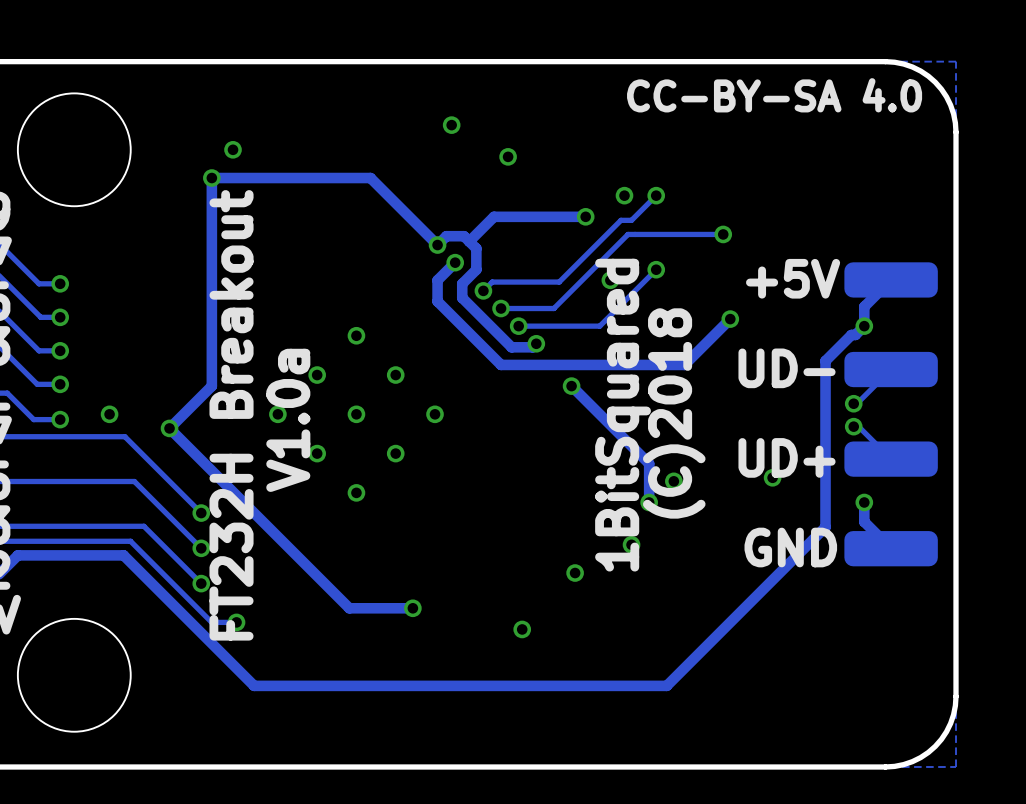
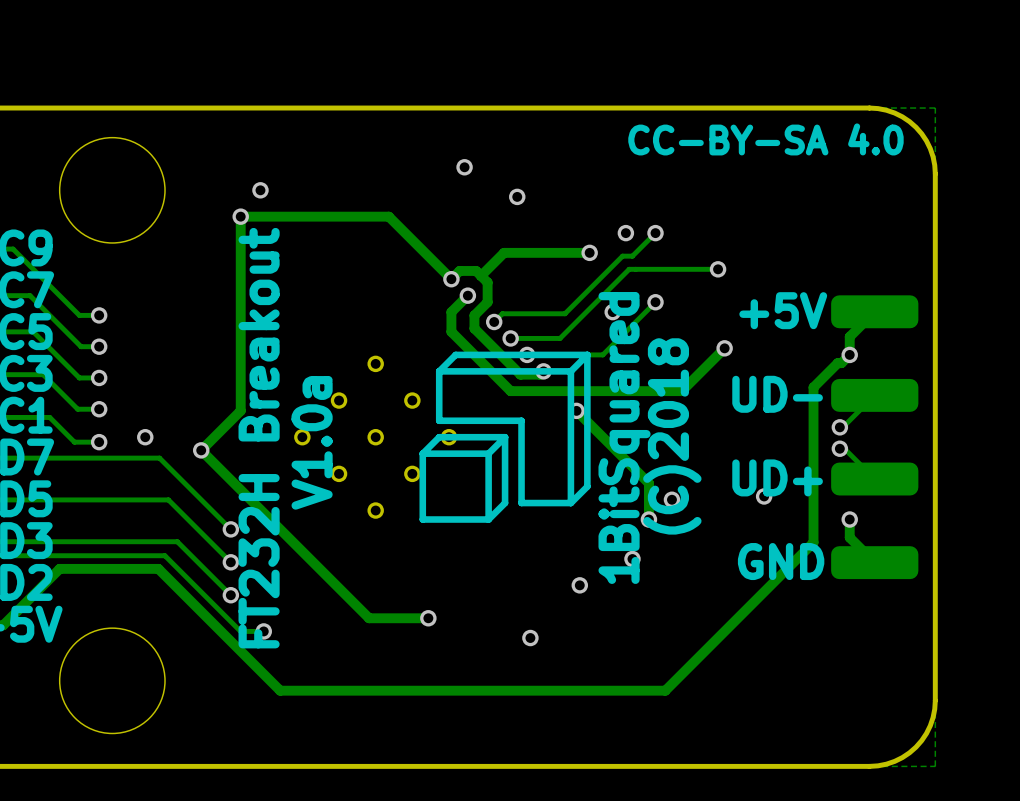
drawing: none -> [419, 351, 591, 523]

